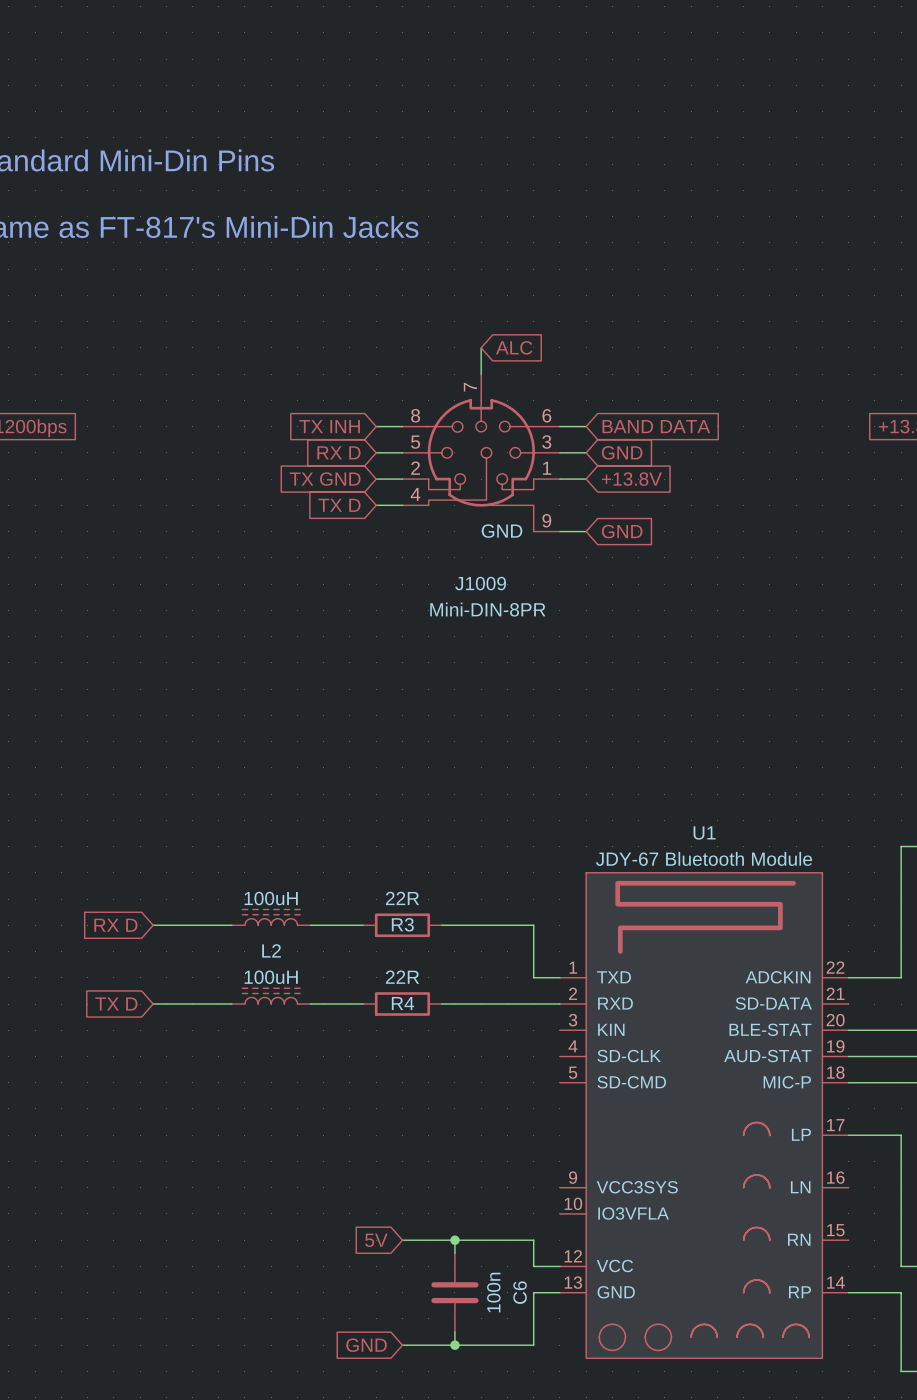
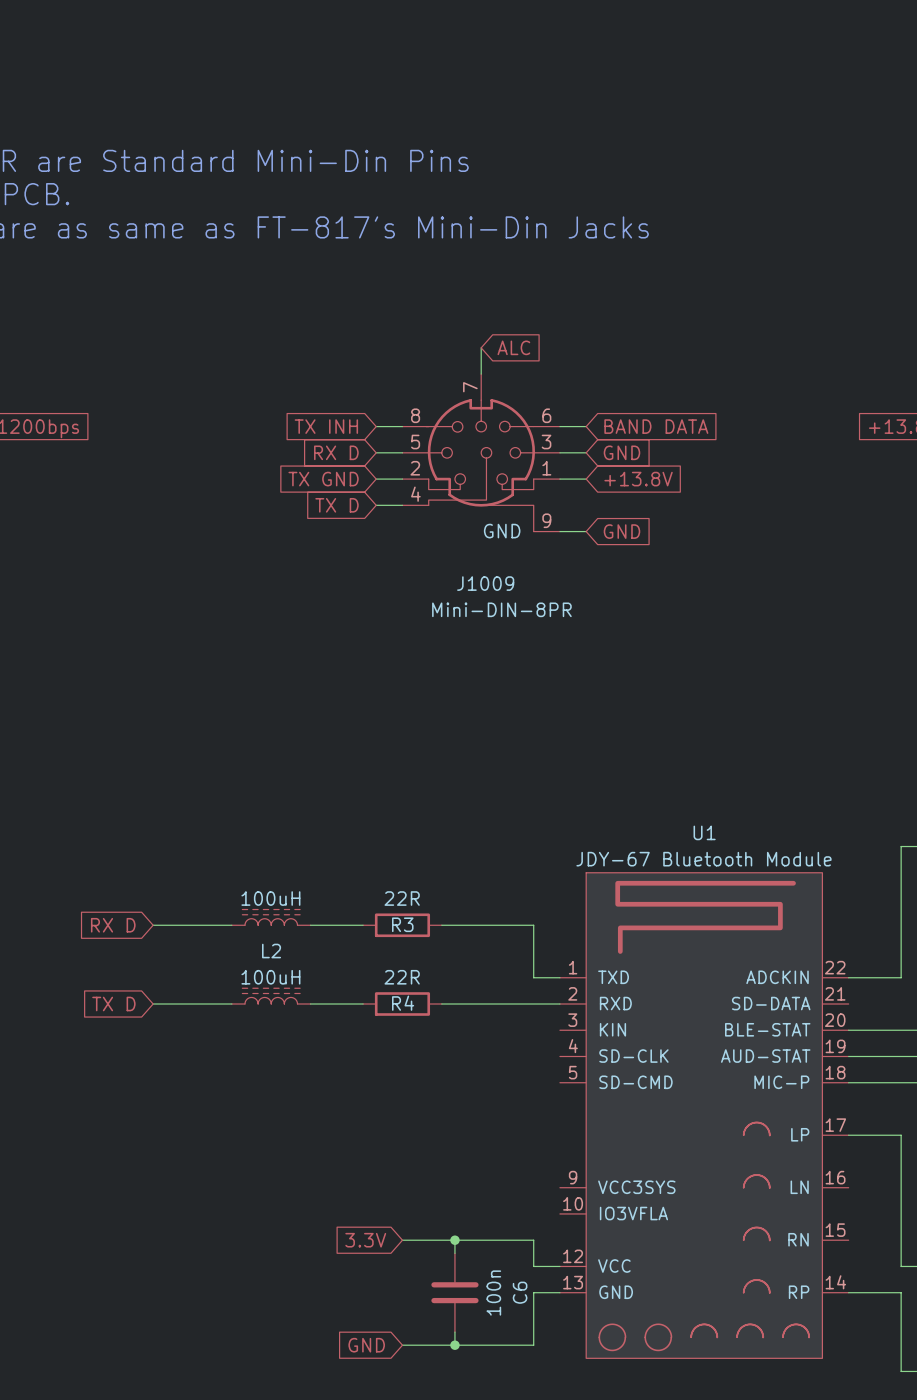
global label: 5V (376, 1240) -> 3.3V (365, 1240)

